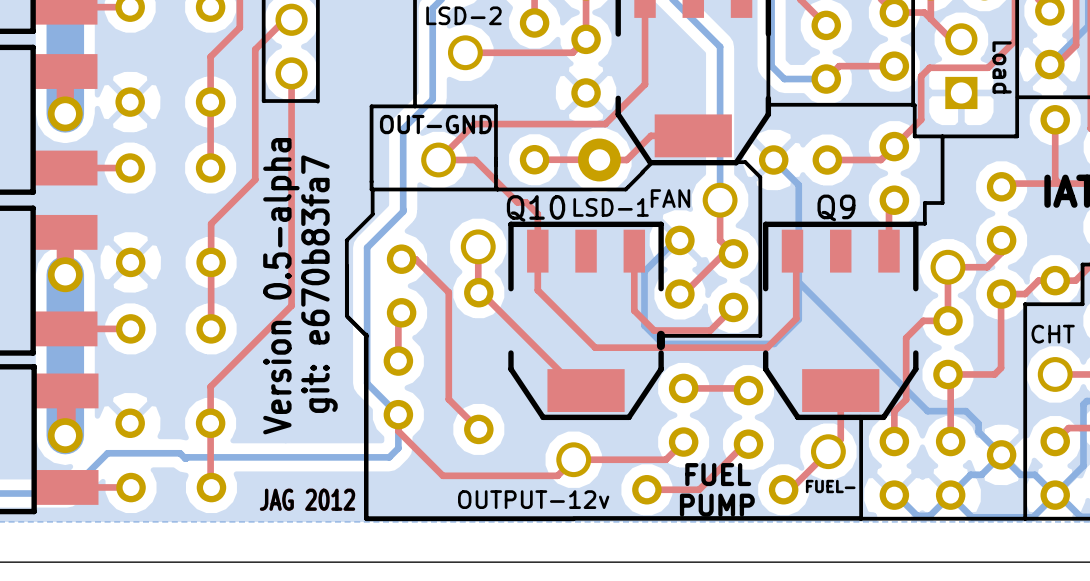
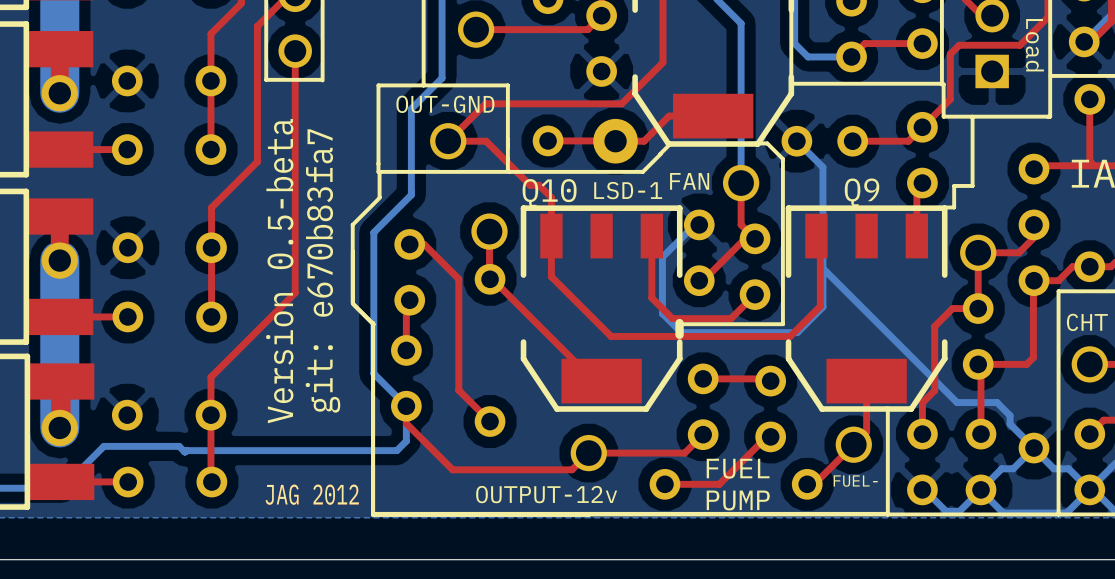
text: Version 0.5-alpha (281, 286) -> Version 0.5-beta (279, 271)

